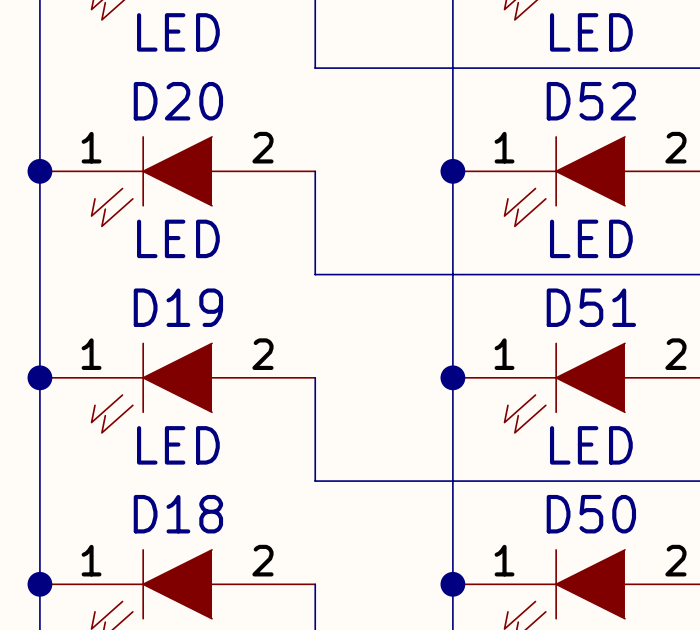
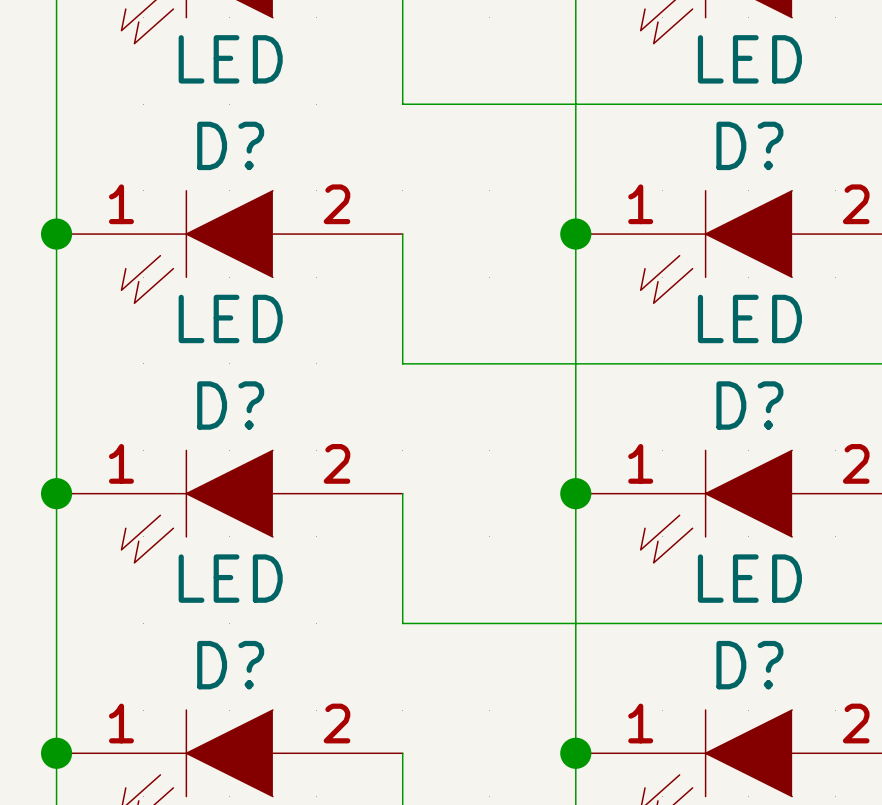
D20 name: D20 (178, 101) -> D? (230, 145)
D52 name: D52 (591, 101) -> D? (749, 145)
D19 name: D19 (178, 307) -> D? (230, 405)
D51 name: D51 (591, 307) -> D? (749, 405)
D18 name: D18 (178, 514) -> D? (230, 665)
D50 name: D50 (591, 514) -> D? (749, 665)

